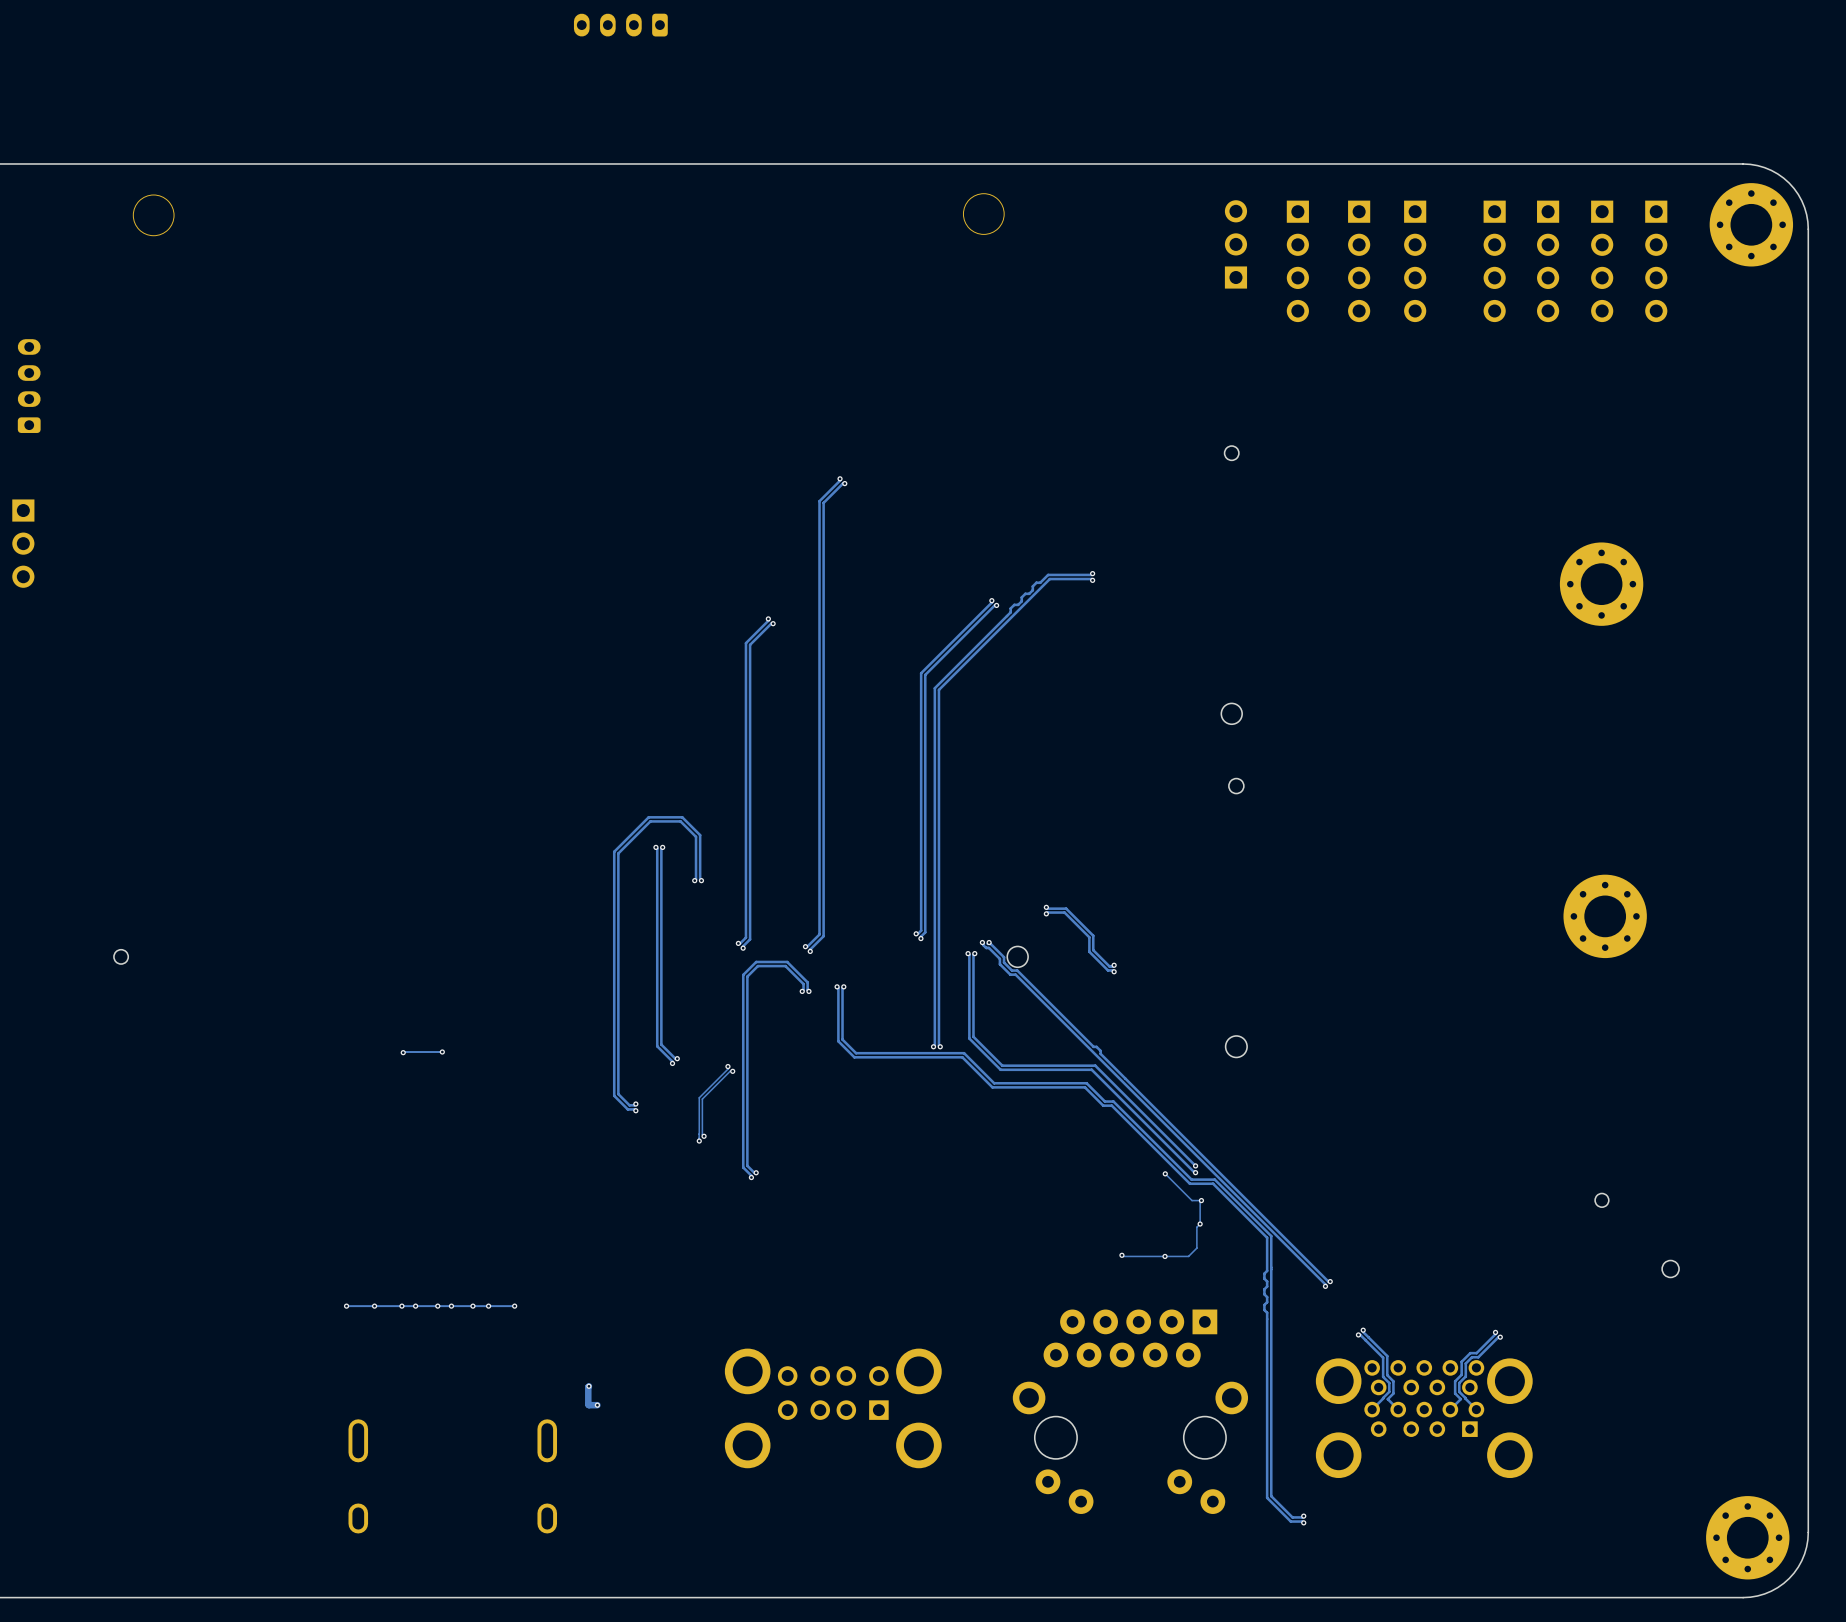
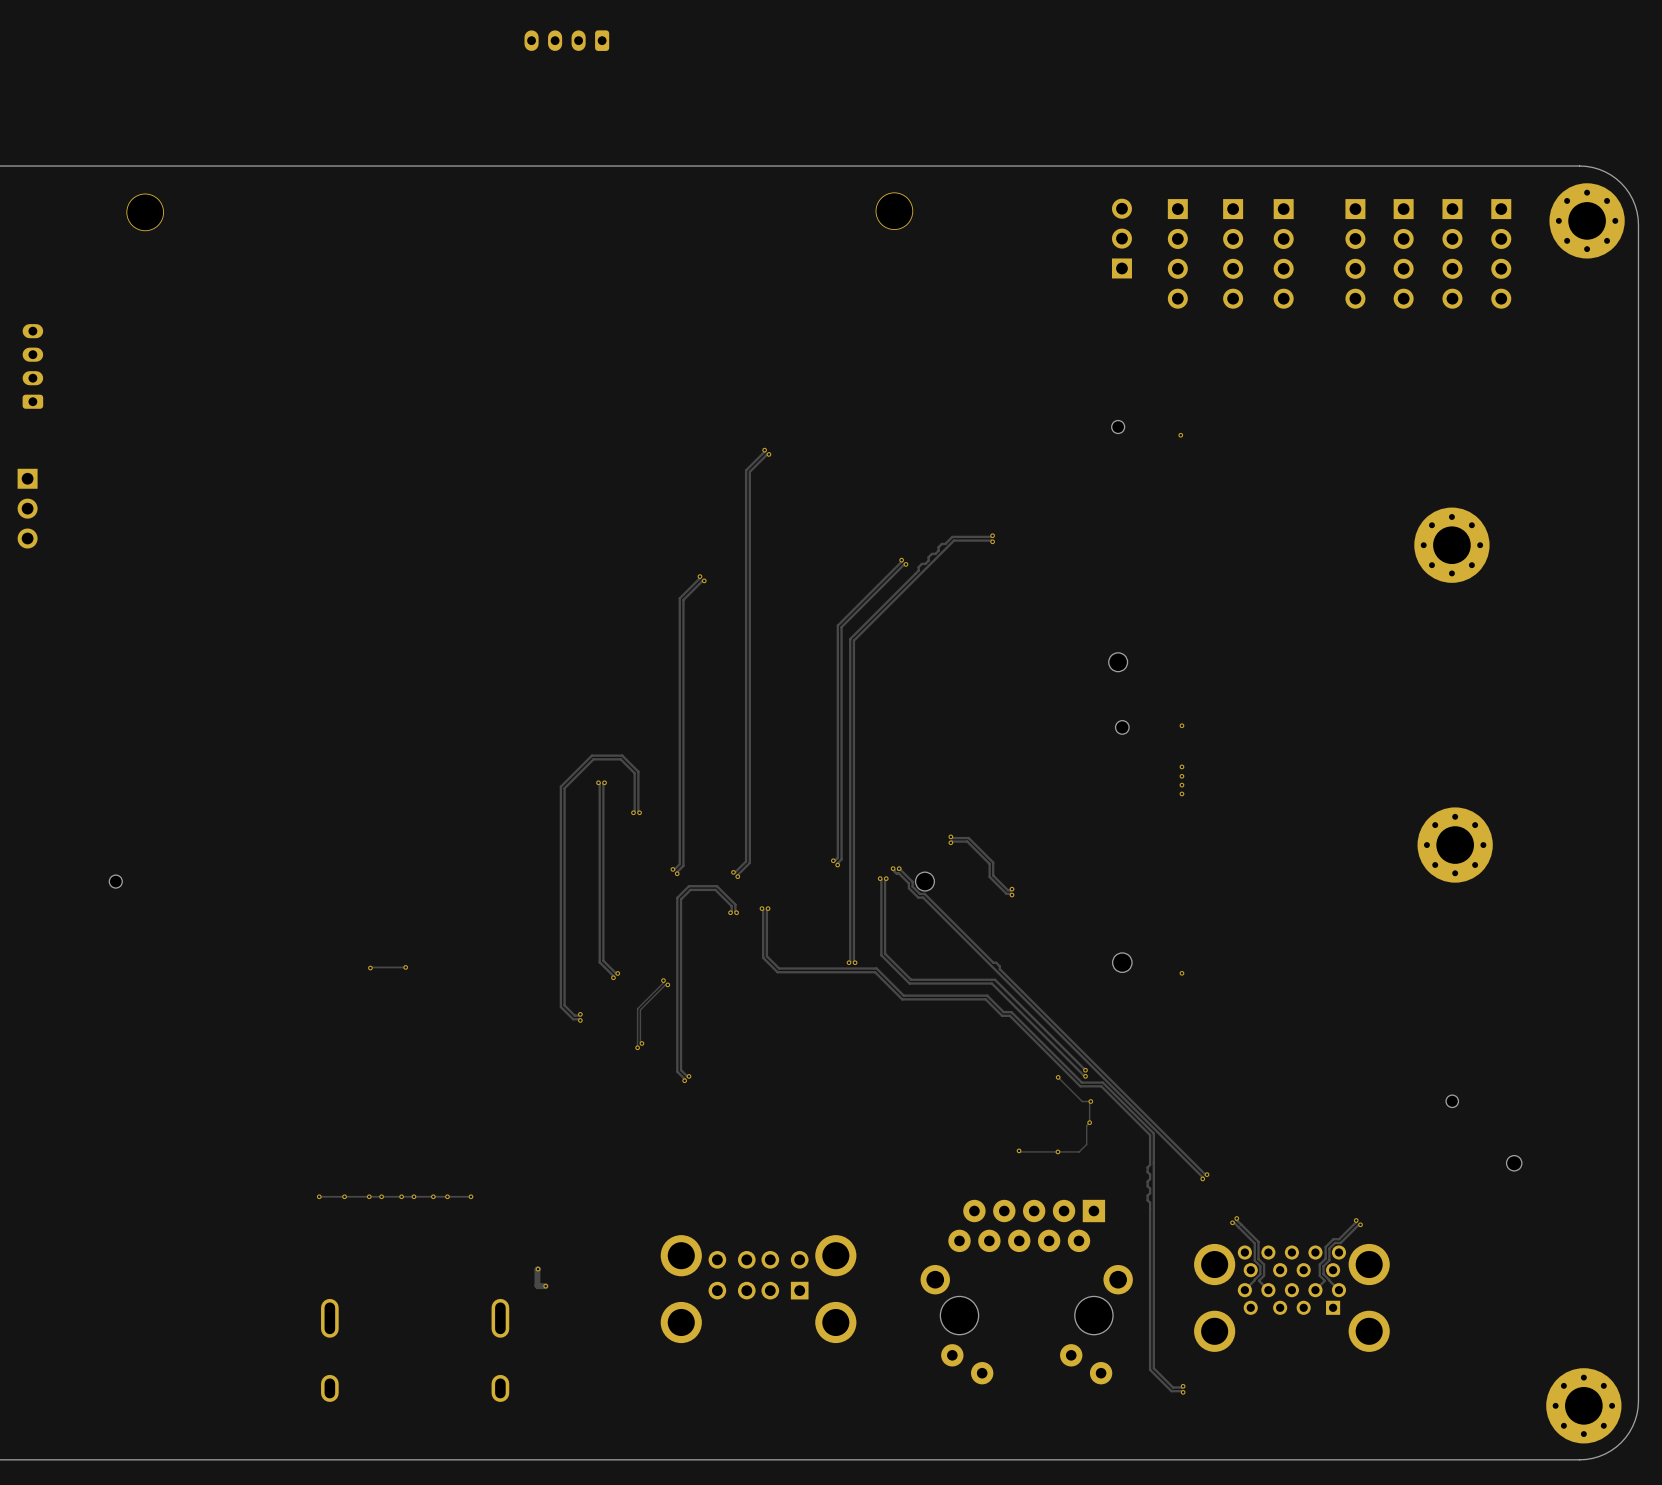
via: none -> (1180, 435)
via: none -> (1181, 725)
via: none -> (1181, 766)
via: none -> (1181, 776)
via: none -> (1181, 785)
via: none -> (1181, 793)
via: none -> (1181, 973)

